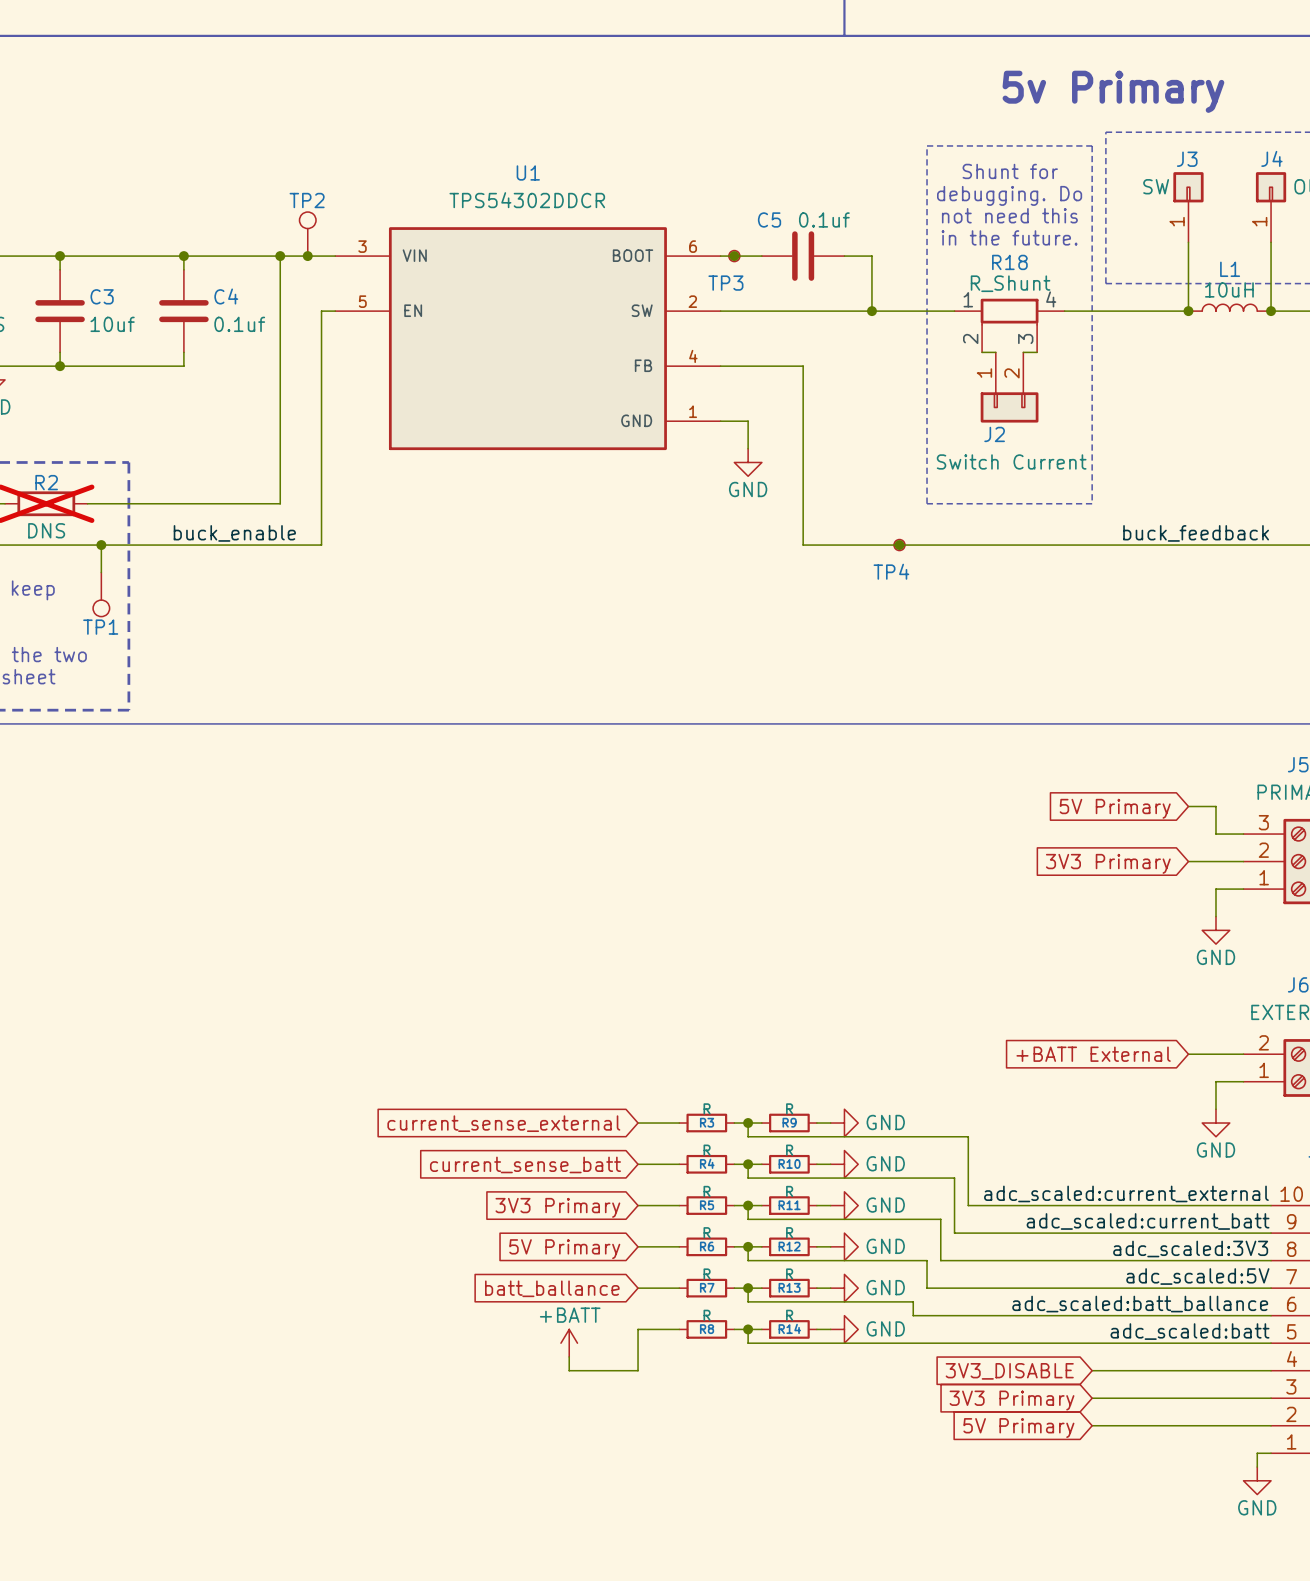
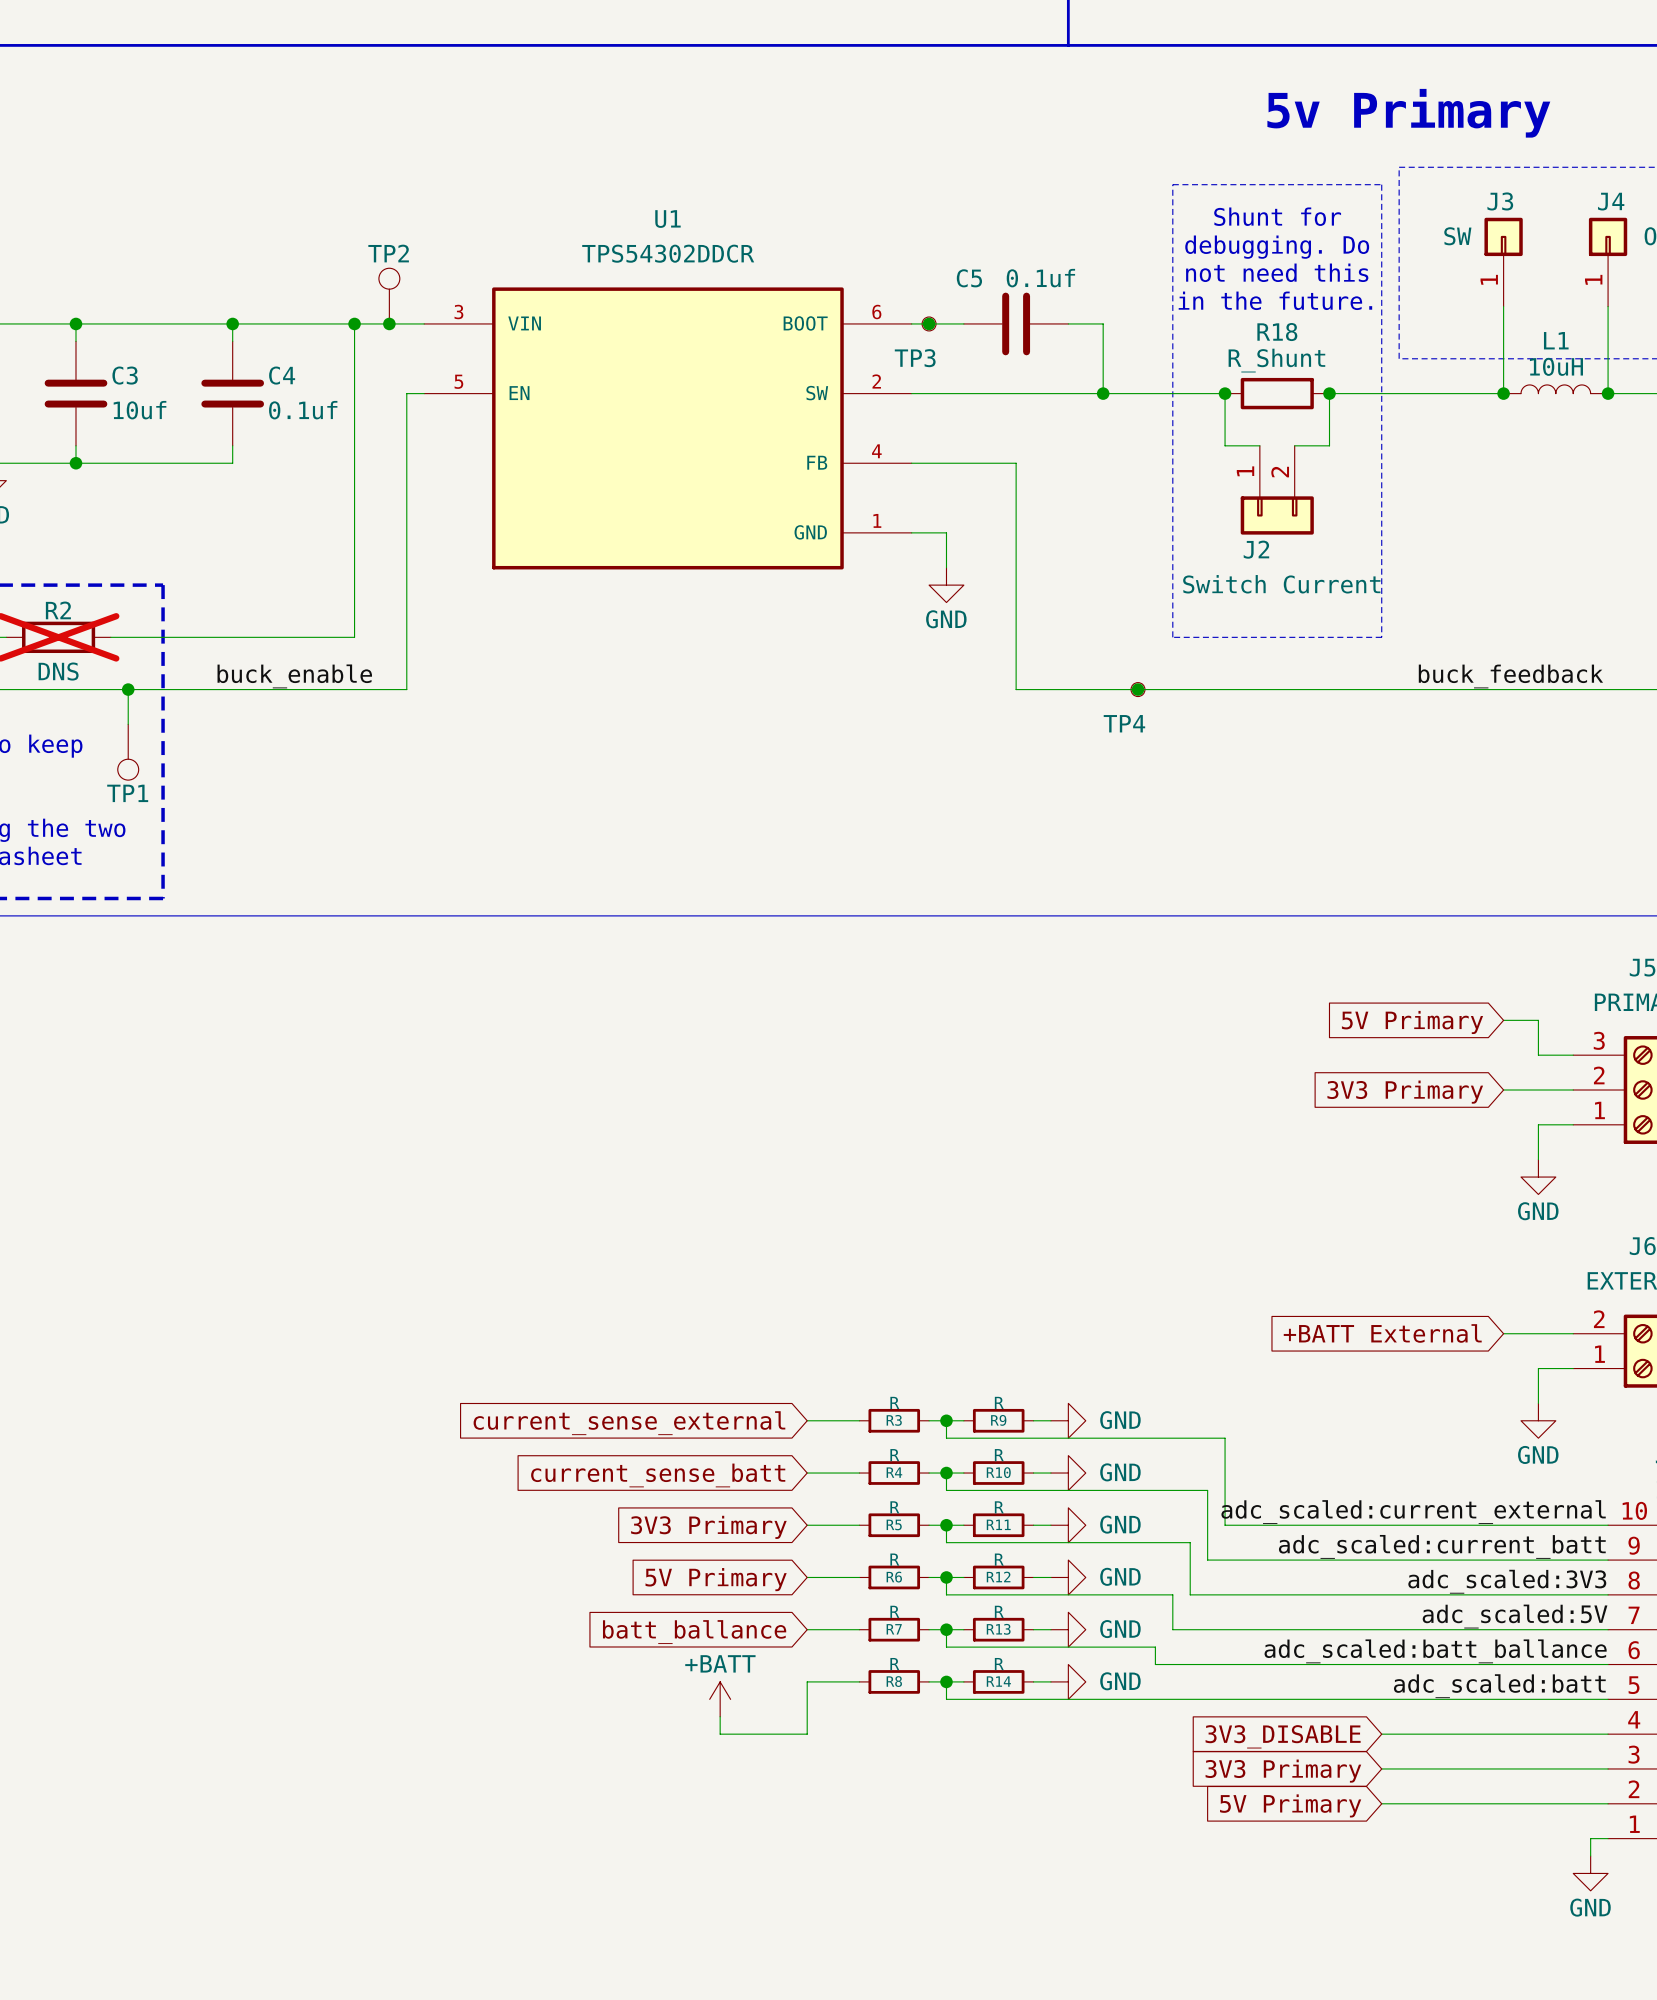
R18 symbol: [954, 298, 1065, 353] -> [1225, 377, 1330, 410]
wire: none -> (1207, 393) (1225, 393) (1225, 445) (1242, 445)
junction: none -> (1225, 393)
junction: none -> (1329, 393)
wire: none -> (1346, 393) (1329, 393) (1329, 445) (1312, 445)

